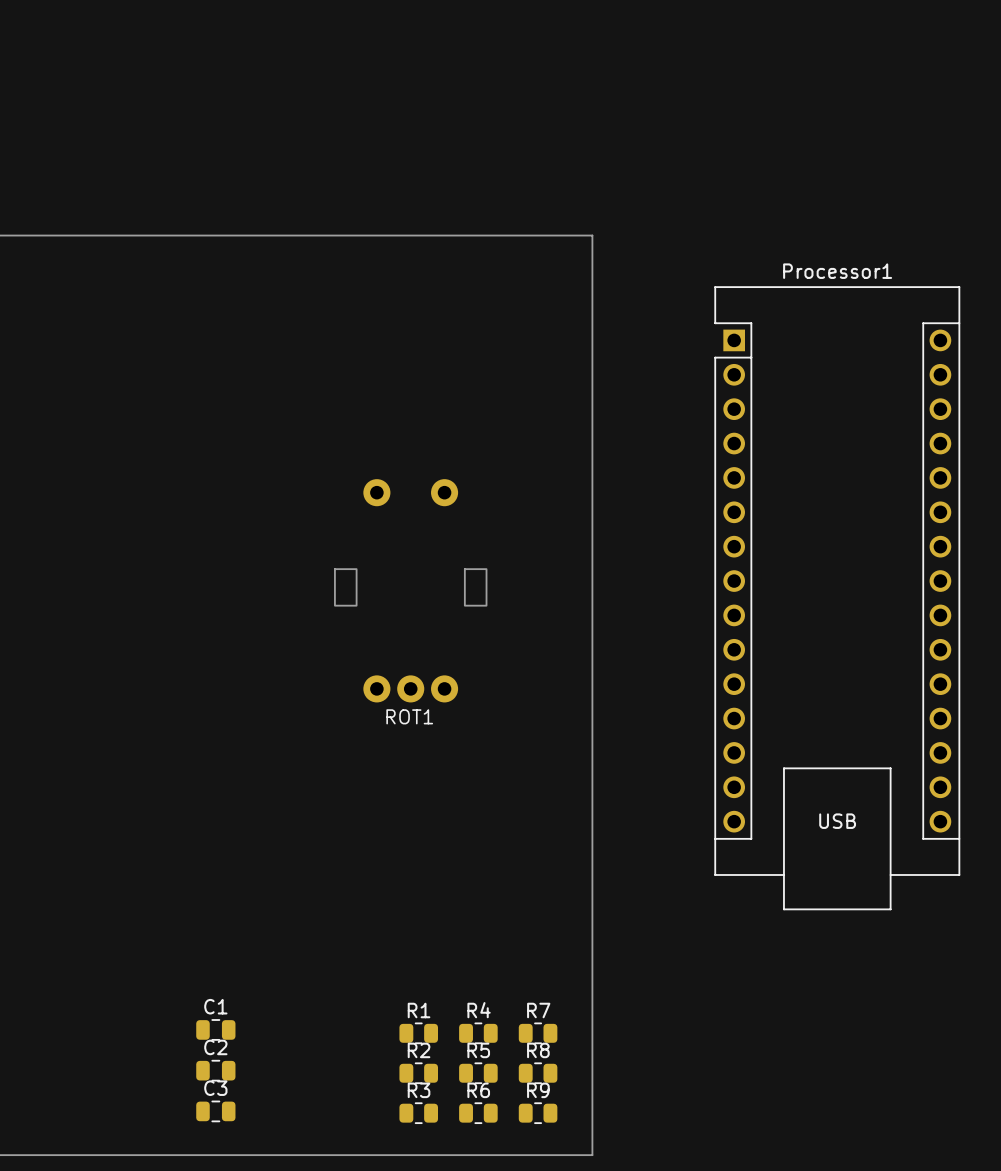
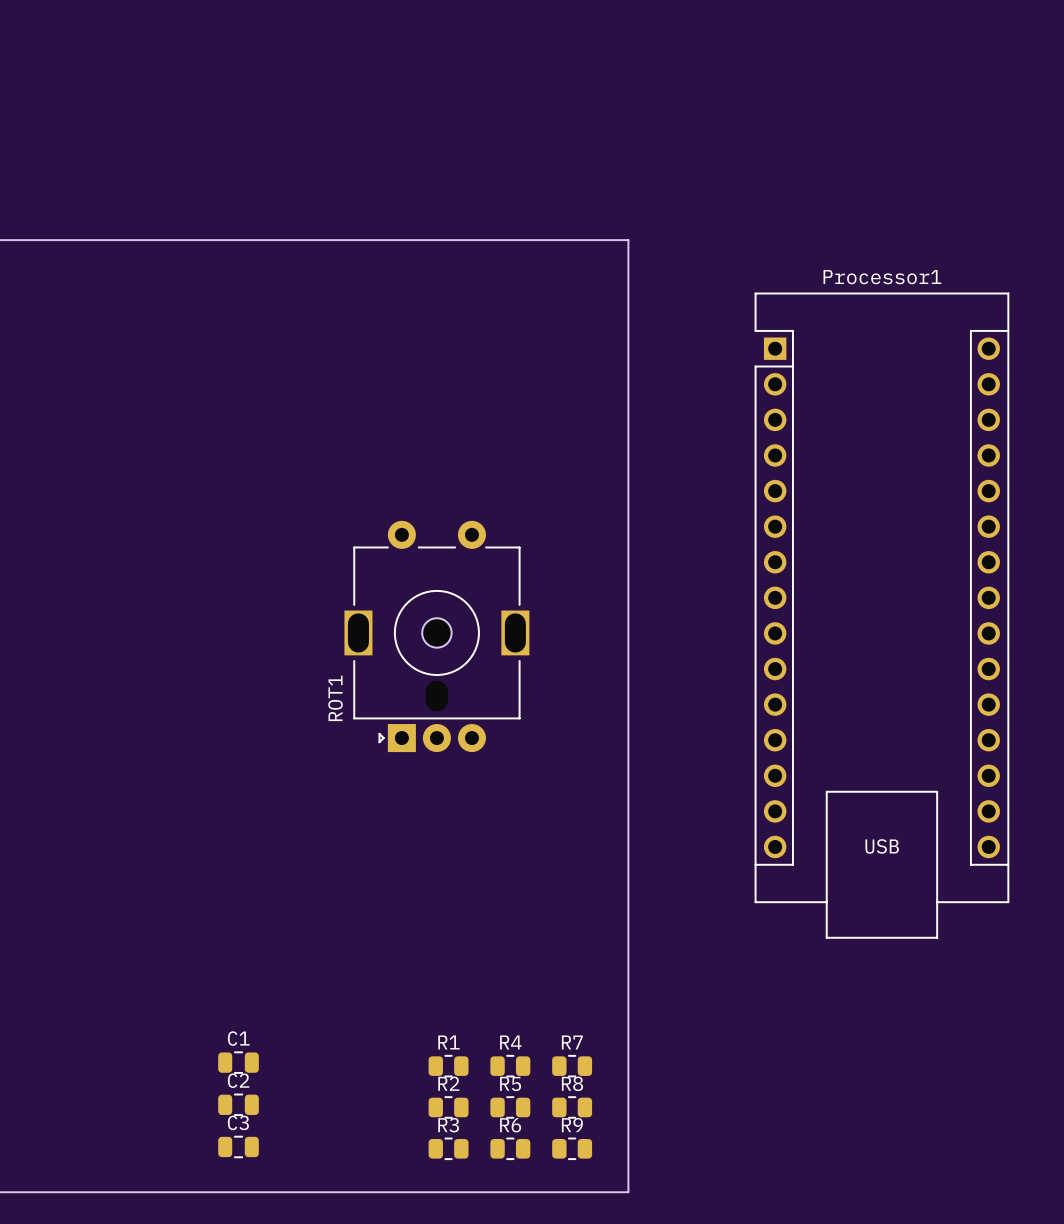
ROT1 footprint: [334, 479, 488, 703] -> [344, 520, 530, 753]
ROT1 name position: ROT1 (409, 716) -> ROT1 (335, 698)

